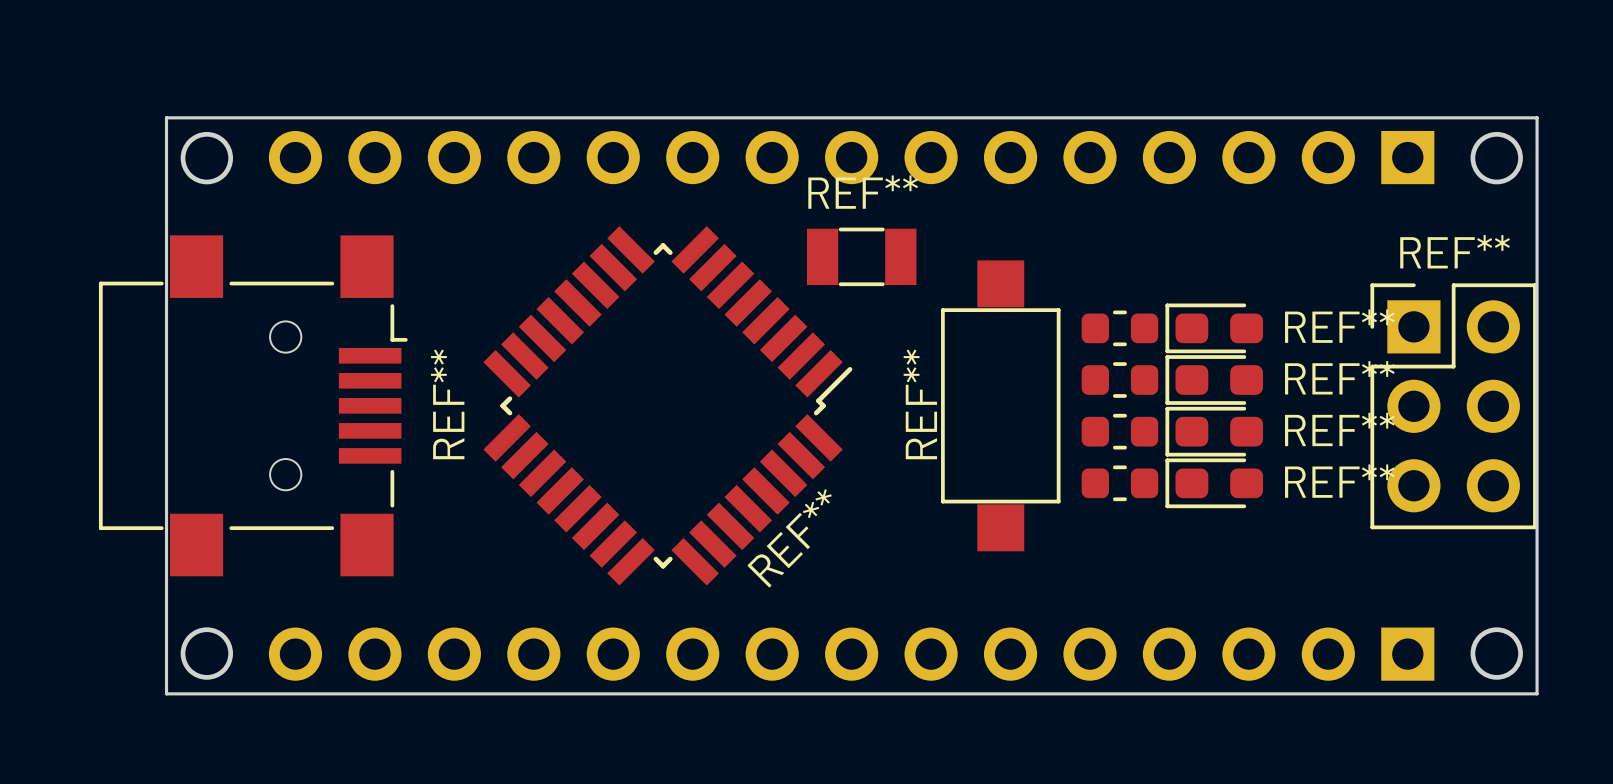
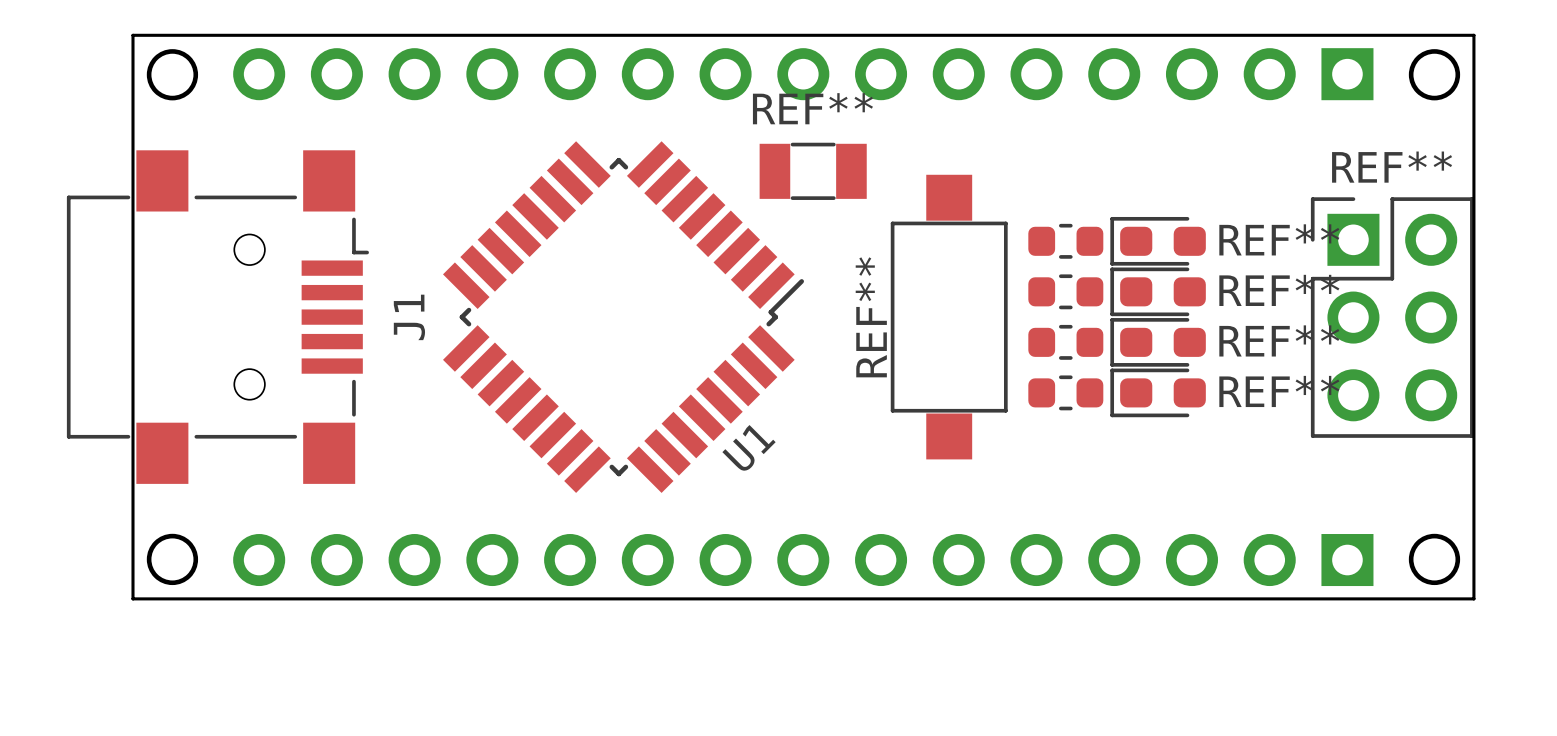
REF** name: REF** (447, 404) -> J1 (409, 317)
REF** name: REF** (789, 538) -> U1 (749, 447)

